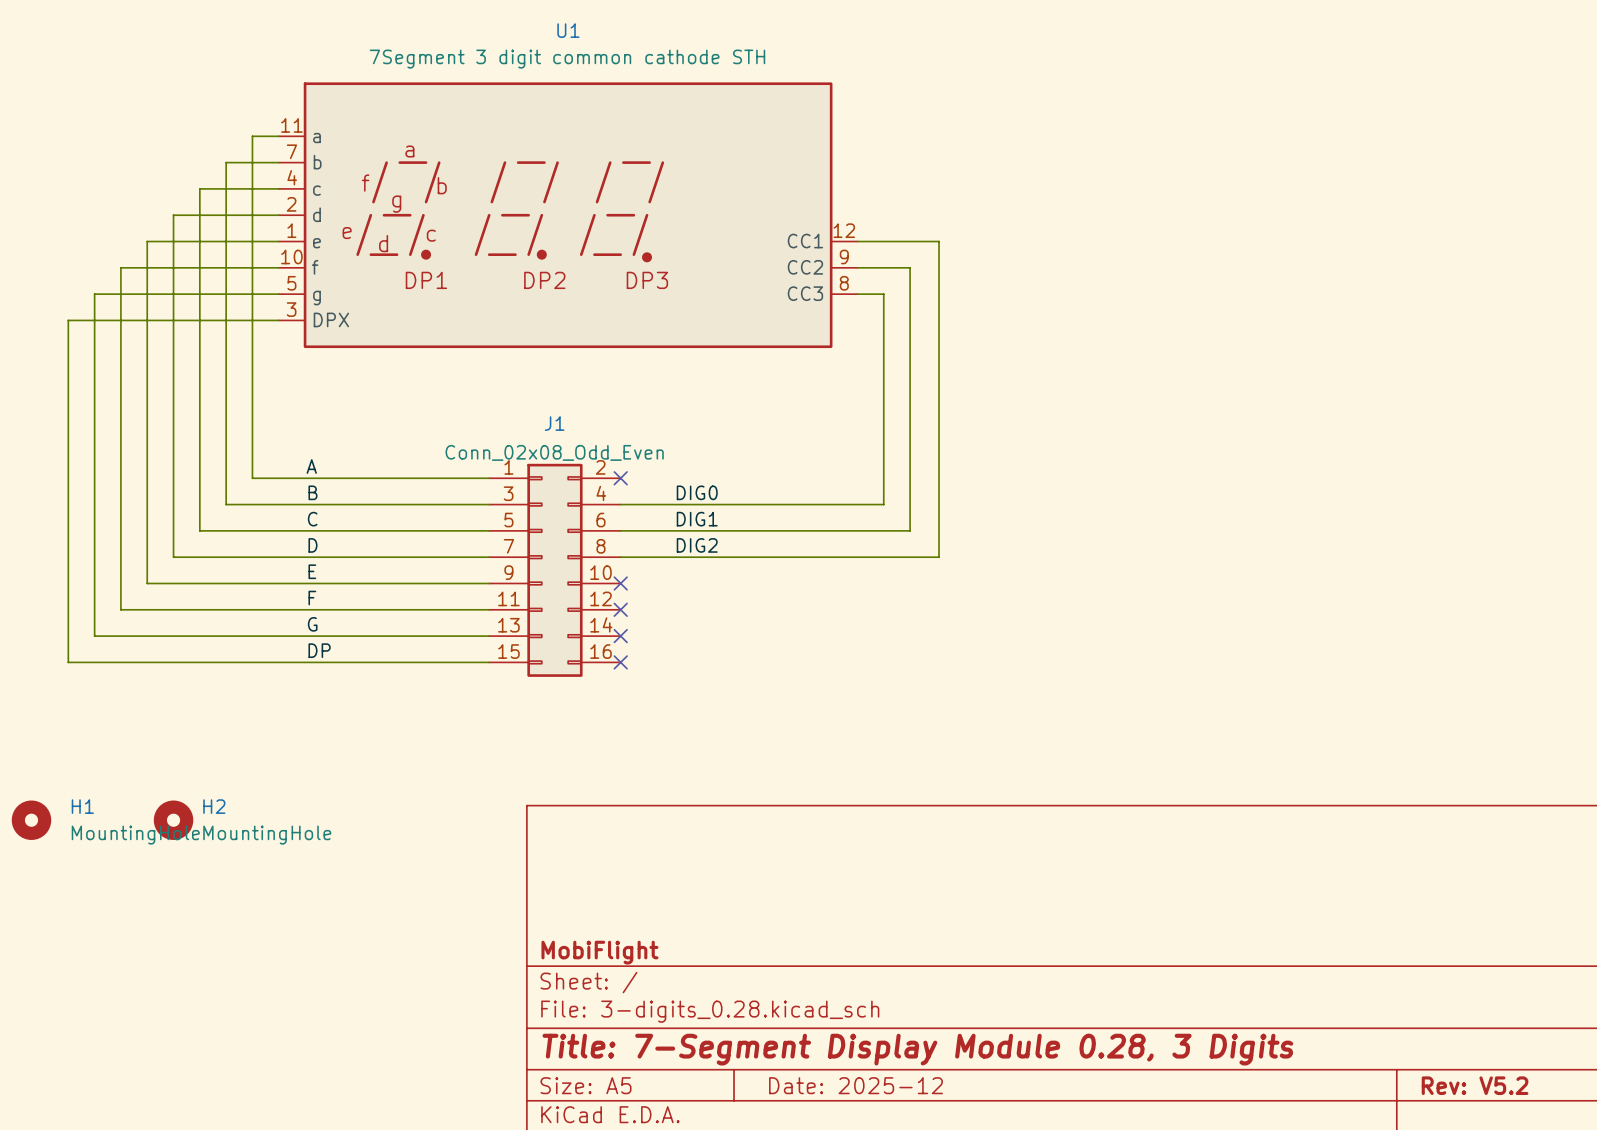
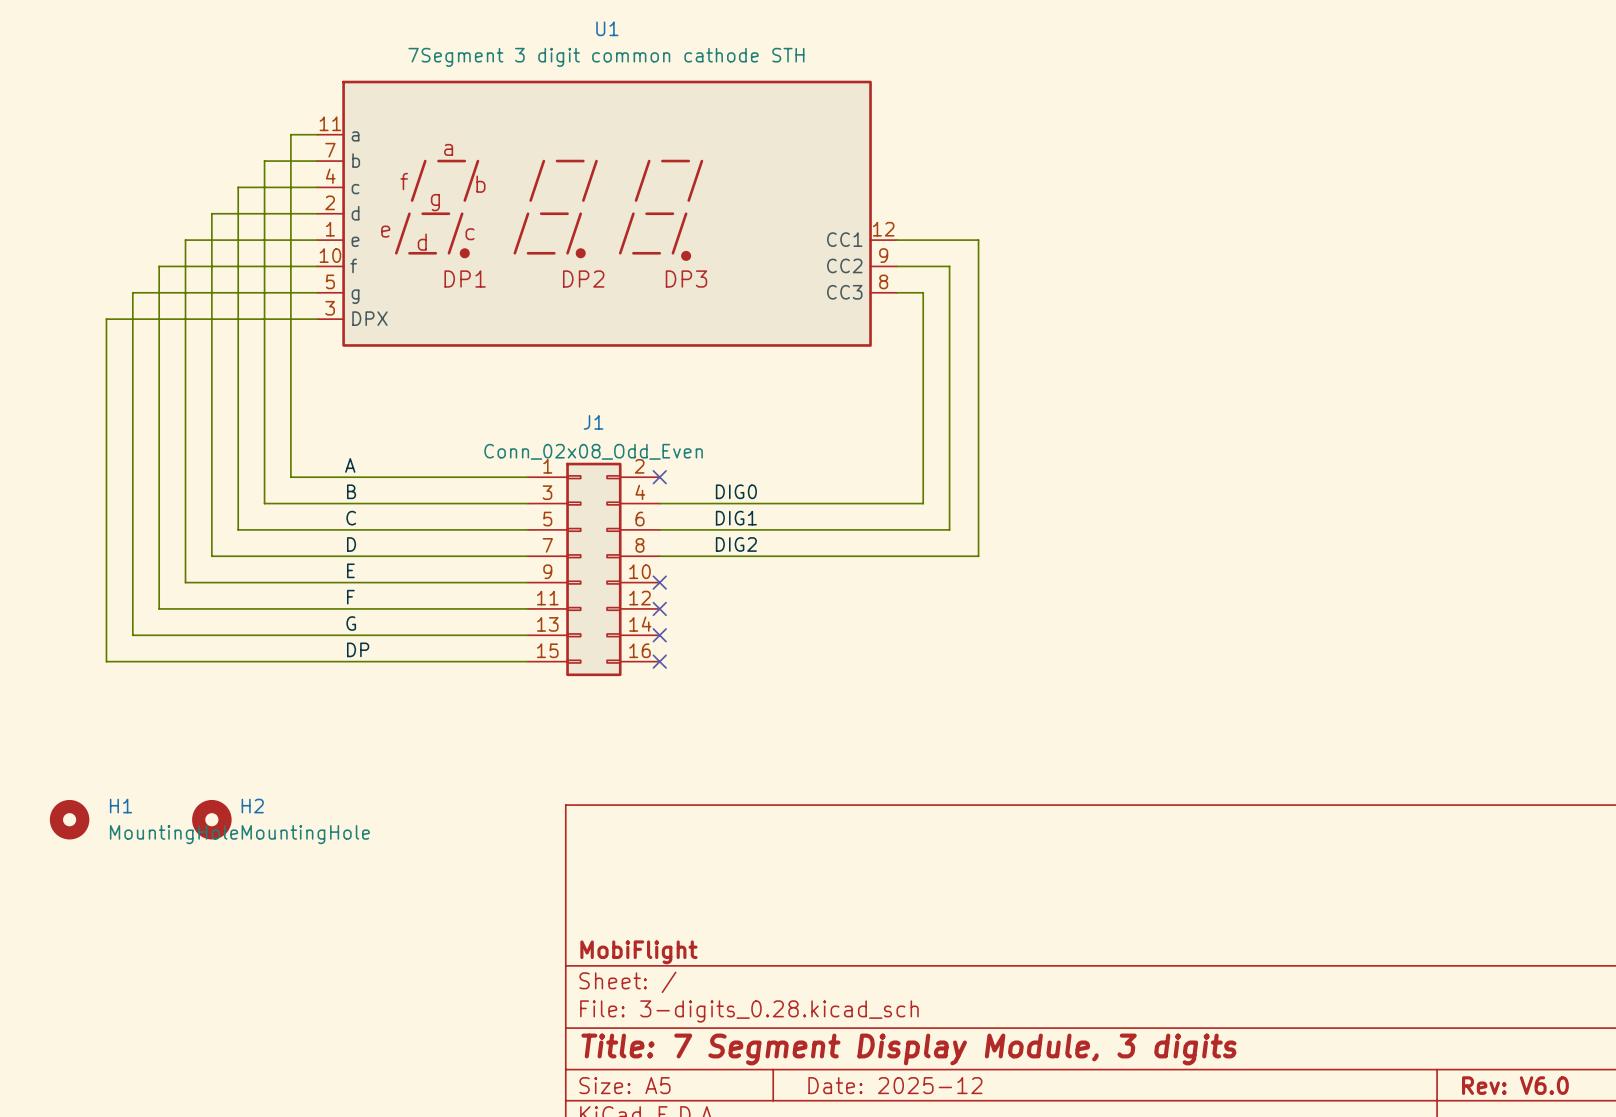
title block: Title: 7-Segment Display Module 0.28, 3 Digits (917, 1049) -> Title: 7 Segment Display Module, 3 digits (908, 1049)
title block: Rev: V5.2 (1475, 1085) -> Rev: V6.0 (1515, 1085)

